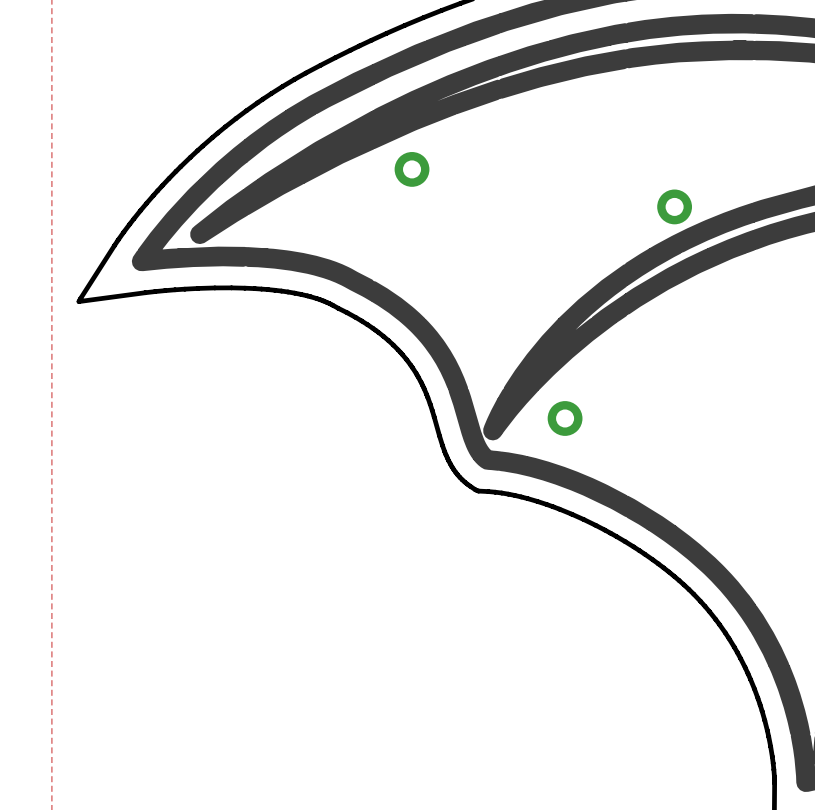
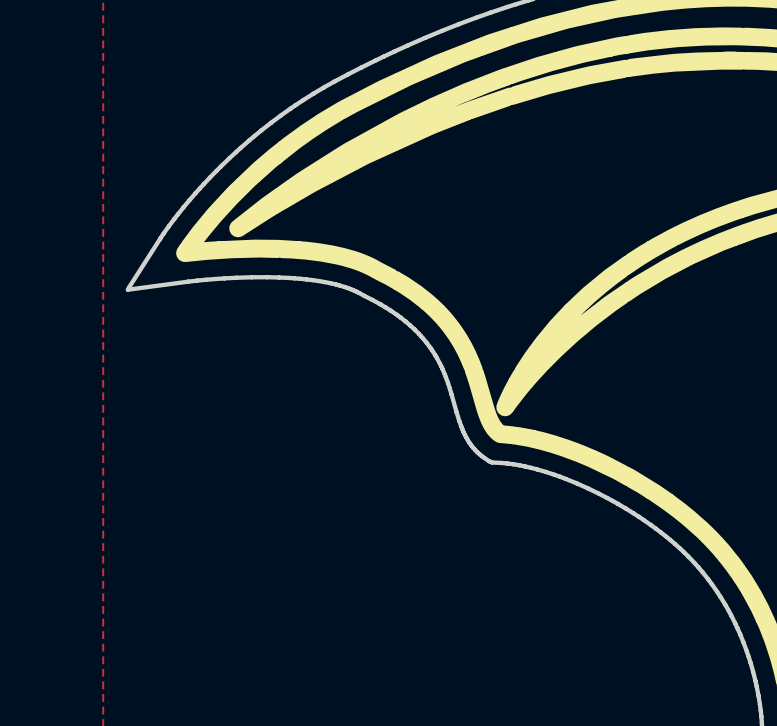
via: (412, 169) -> none
via: (674, 206) -> none
via: (565, 418) -> none

